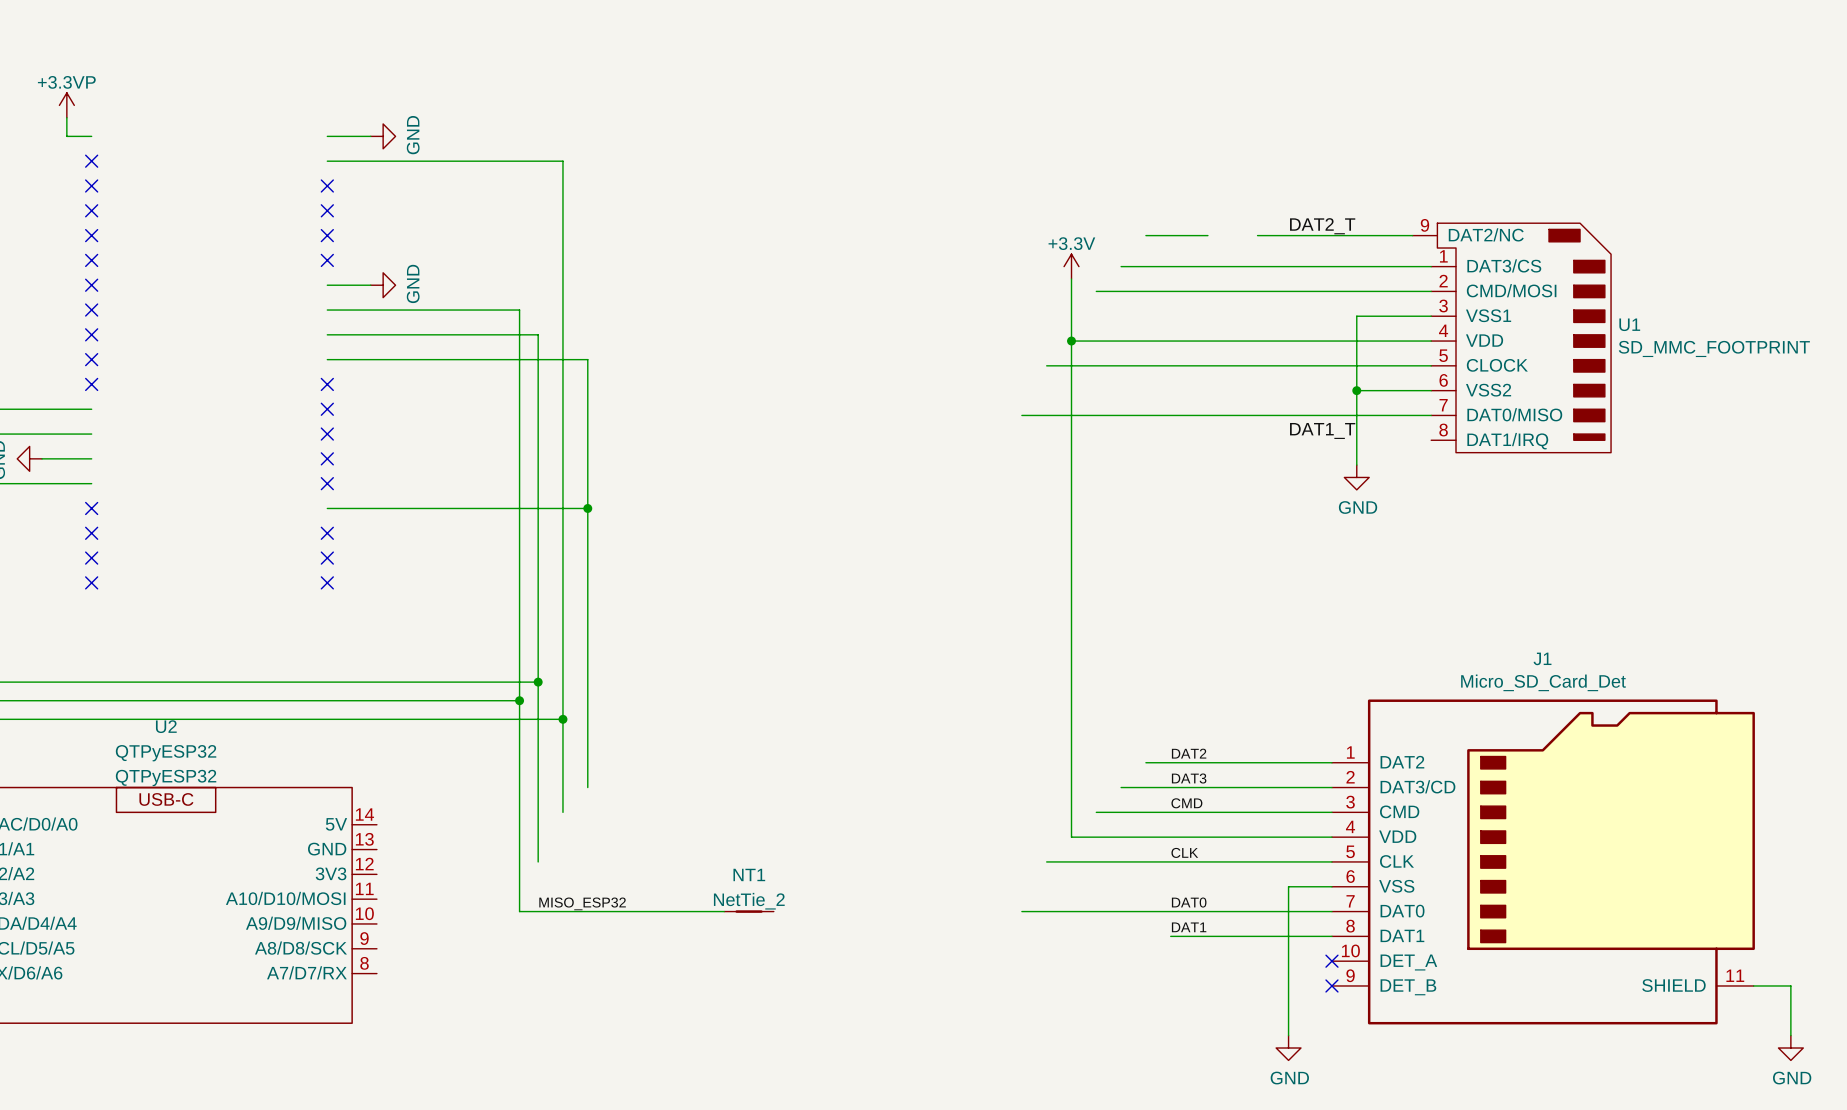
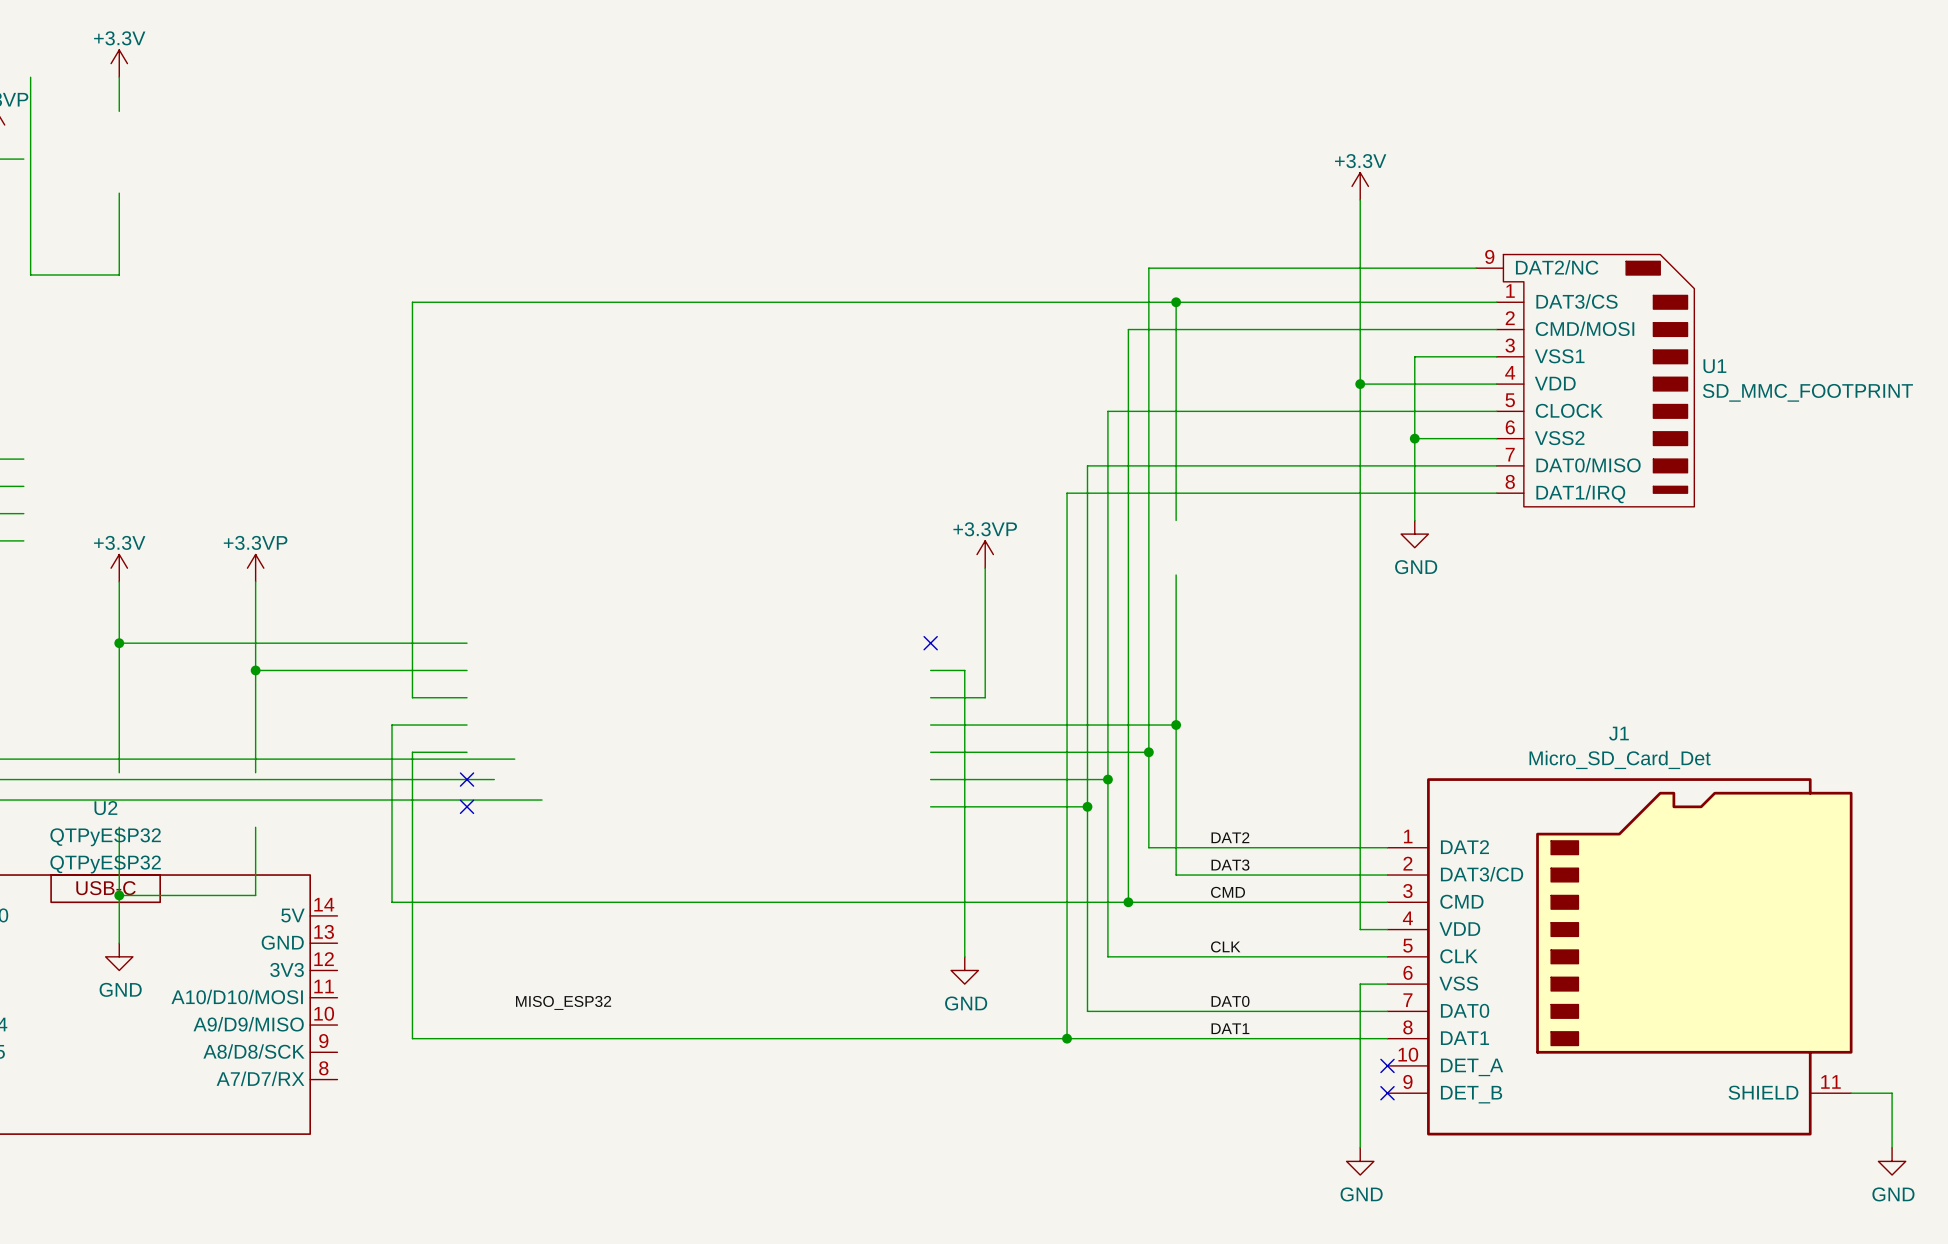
power symbol: none -> +3.3V (119, 63)
wire: none -> (30, 77) (30, 274) (119, 274) (119, 193)
wire: none -> (119, 77) (119, 111)
wire: (327, 136) (370, 136) -> none
power symbol: GND (383, 136) -> none
no-connect mark: (91, 161) -> none
wire: (327, 161) (562, 161) (562, 812) -> none
power symbol: none -> +3.3V (1360, 186)
no-connect mark: (91, 185) -> none
no-connect mark: (327, 185) -> none
no-connect mark: (91, 210) -> none
no-connect mark: (327, 210) -> none
label: DAT2_T (1322, 226) -> none
no-connect mark: (91, 235) -> none
no-connect mark: (327, 235) -> none
wire: none -> (1182, 268) (1148, 268) (1148, 847) (1182, 847)
wire: none -> (1251, 268) (1305, 268)
no-connect mark: (91, 260) -> none
no-connect mark: (327, 260) -> none
power symbol: +3.3V (1071, 266) -> none
wire: none -> (1155, 302) (412, 302) (412, 697) (467, 697)
wire: none -> (1176, 302) (1176, 520)
junction: none -> (1176, 302)
wire: (1071, 279) (1071, 837) (1307, 837) -> (1360, 199) (1360, 929)
no-connect mark: (91, 285) -> none
wire: (327, 285) (370, 285) -> none
power symbol: GND (383, 285) -> none
wire: none -> (1128, 329) (1128, 902) (392, 902) (392, 725) (467, 725)
no-connect mark: (91, 310) -> none
wire: (327, 310) (519, 310) (519, 911) (724, 911) -> none
no-connect mark: (91, 334) -> none
wire: (327, 334) (538, 334) (538, 861) -> none
wire: (1071, 341) (1307, 341) -> none
junction: (1071, 341) -> none
junction: none -> (1360, 384)
no-connect mark: (91, 359) -> none
wire: (327, 359) (587, 359) (587, 787) -> none
wire: (1046, 365) (1077, 365) -> (1107, 956) (1107, 411)
no-connect mark: (91, 384) -> none
no-connect mark: (327, 384) -> none
no-connect mark: (327, 409) -> none
wire: (1021, 415) (1059, 415) -> (1087, 1011) (1087, 465)
label: DAT1_T (1322, 430) -> none
no-connect mark: (327, 434) -> none
wire: none -> (1496, 493) (1067, 493) (1067, 1038)
no-connect mark: (327, 458) -> none
no-connect mark: (327, 483) -> none
power symbol: none -> +3.3VP (985, 554)
no-connect mark: (91, 508) -> none
power symbol: none -> +3.3V (119, 568)
power symbol: none -> +3.3VP (255, 568)
wire: (327, 508) (587, 508) -> none
junction: (587, 508) -> none
wire: none -> (985, 568) (985, 697) (930, 697)
wire: none -> (119, 581) (119, 772)
wire: none -> (255, 581) (255, 772)
no-connect mark: (91, 533) -> none
no-connect mark: (327, 533) -> none
no-connect mark: (91, 558) -> none
no-connect mark: (327, 558) -> none
wire: none -> (119, 643) (467, 643)
junction: none -> (119, 643)
no-connect mark: none -> (930, 643)
no-connect mark: (91, 582) -> none
no-connect mark: (327, 582) -> none
wire: none -> (255, 670) (467, 670)
junction: none -> (255, 670)
wire: none -> (930, 670) (964, 670) (964, 956)
wire: none -> (930, 725) (1176, 725)
junction: none -> (1176, 725)
wire: none -> (467, 752) (412, 752) (412, 1038) (1210, 1038)
wire: none -> (930, 752) (1148, 752)
junction: none -> (1148, 752)
junction: (538, 682) -> none
no-connect mark: none -> (467, 779)
junction: (519, 700) -> none
wire: none -> (930, 779) (1107, 779)
junction: none -> (1107, 779)
junction: (562, 719) -> none
no-connect mark: none -> (467, 806)
wire: none -> (930, 806) (1087, 806)
junction: none -> (1087, 806)
wire: none -> (119, 827) (119, 943)
wire: none -> (255, 827) (255, 895) (119, 895)
wire: (1121, 787) (1139, 787) -> (1176, 575) (1176, 875)
junction: none -> (119, 895)
junction: none -> (1128, 902)
power symbol: none -> GND (119, 956)
wire: (1046, 861) (1077, 861) -> none
power symbol: none -> GND (964, 970)
wire: (1307, 886) (1288, 886) (1288, 1035) -> (1360, 984) (1360, 1147)
NT1: NetTie_2 (749, 911) -> none
wire: (1021, 911) (1059, 911) -> none
junction: none -> (1067, 1038)
power symbol position: GND (1288, 1048) -> GND (1360, 1161)

